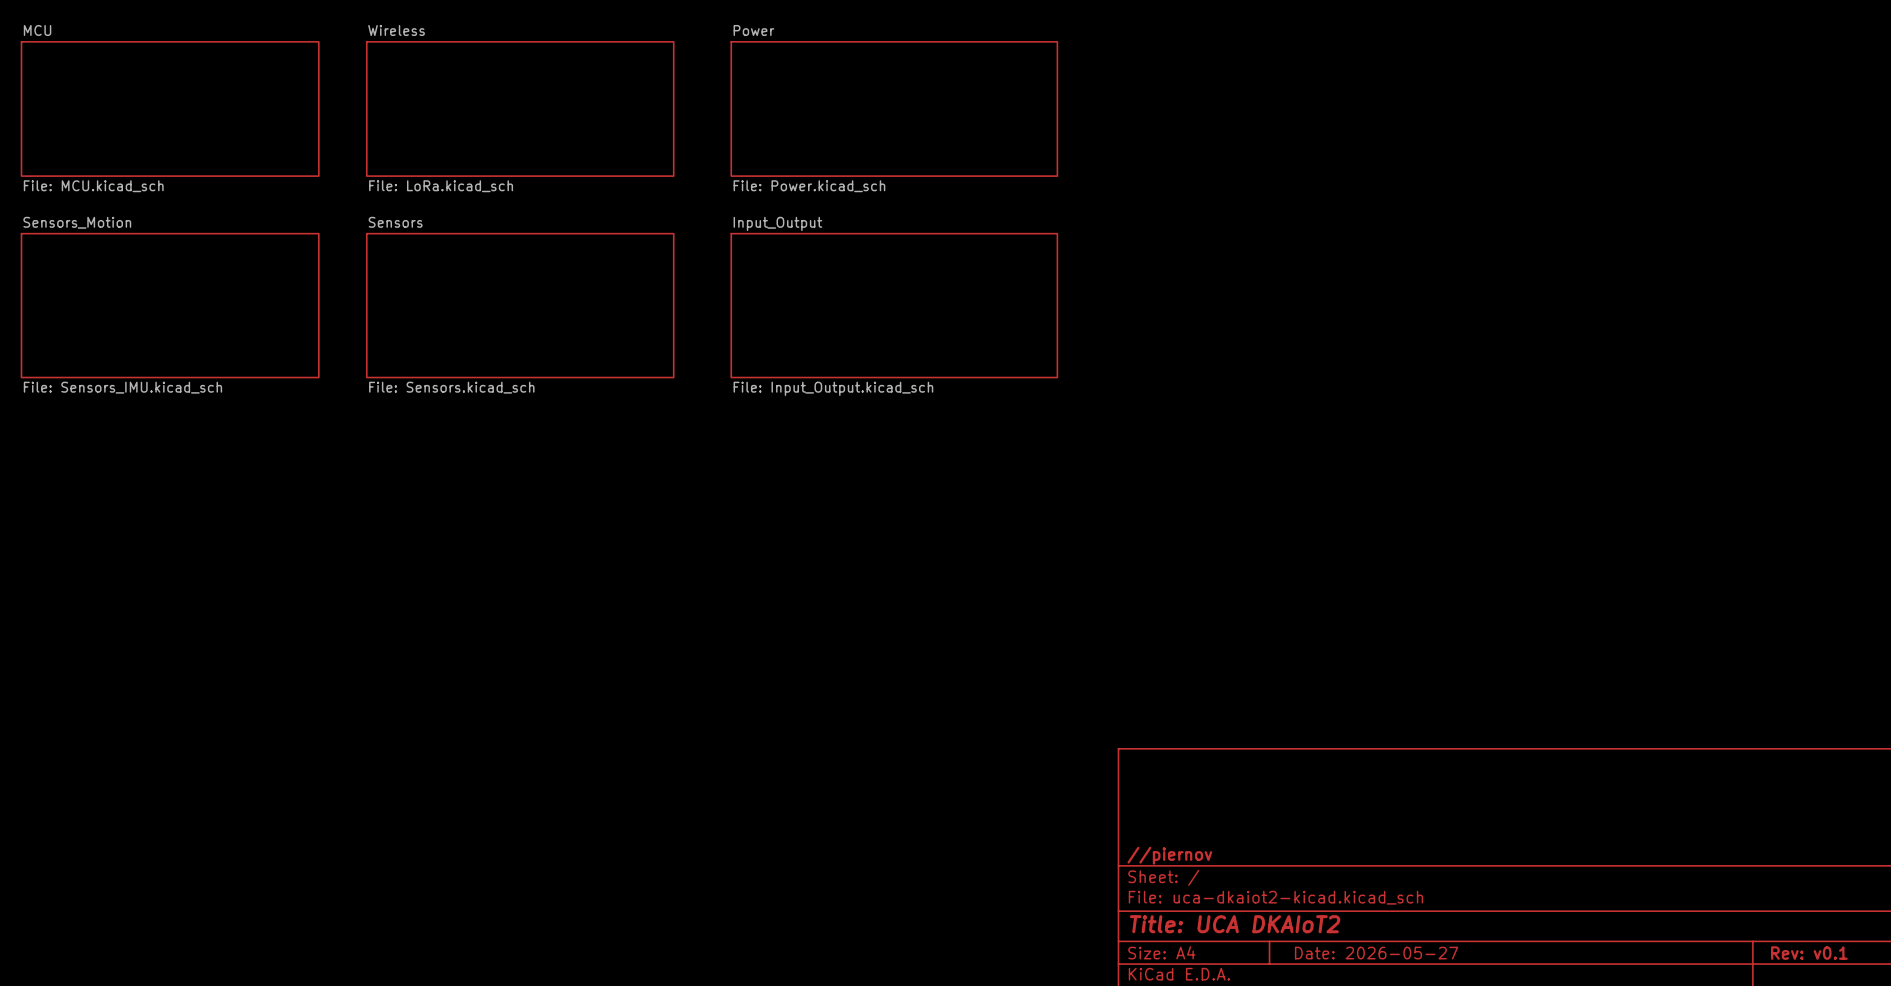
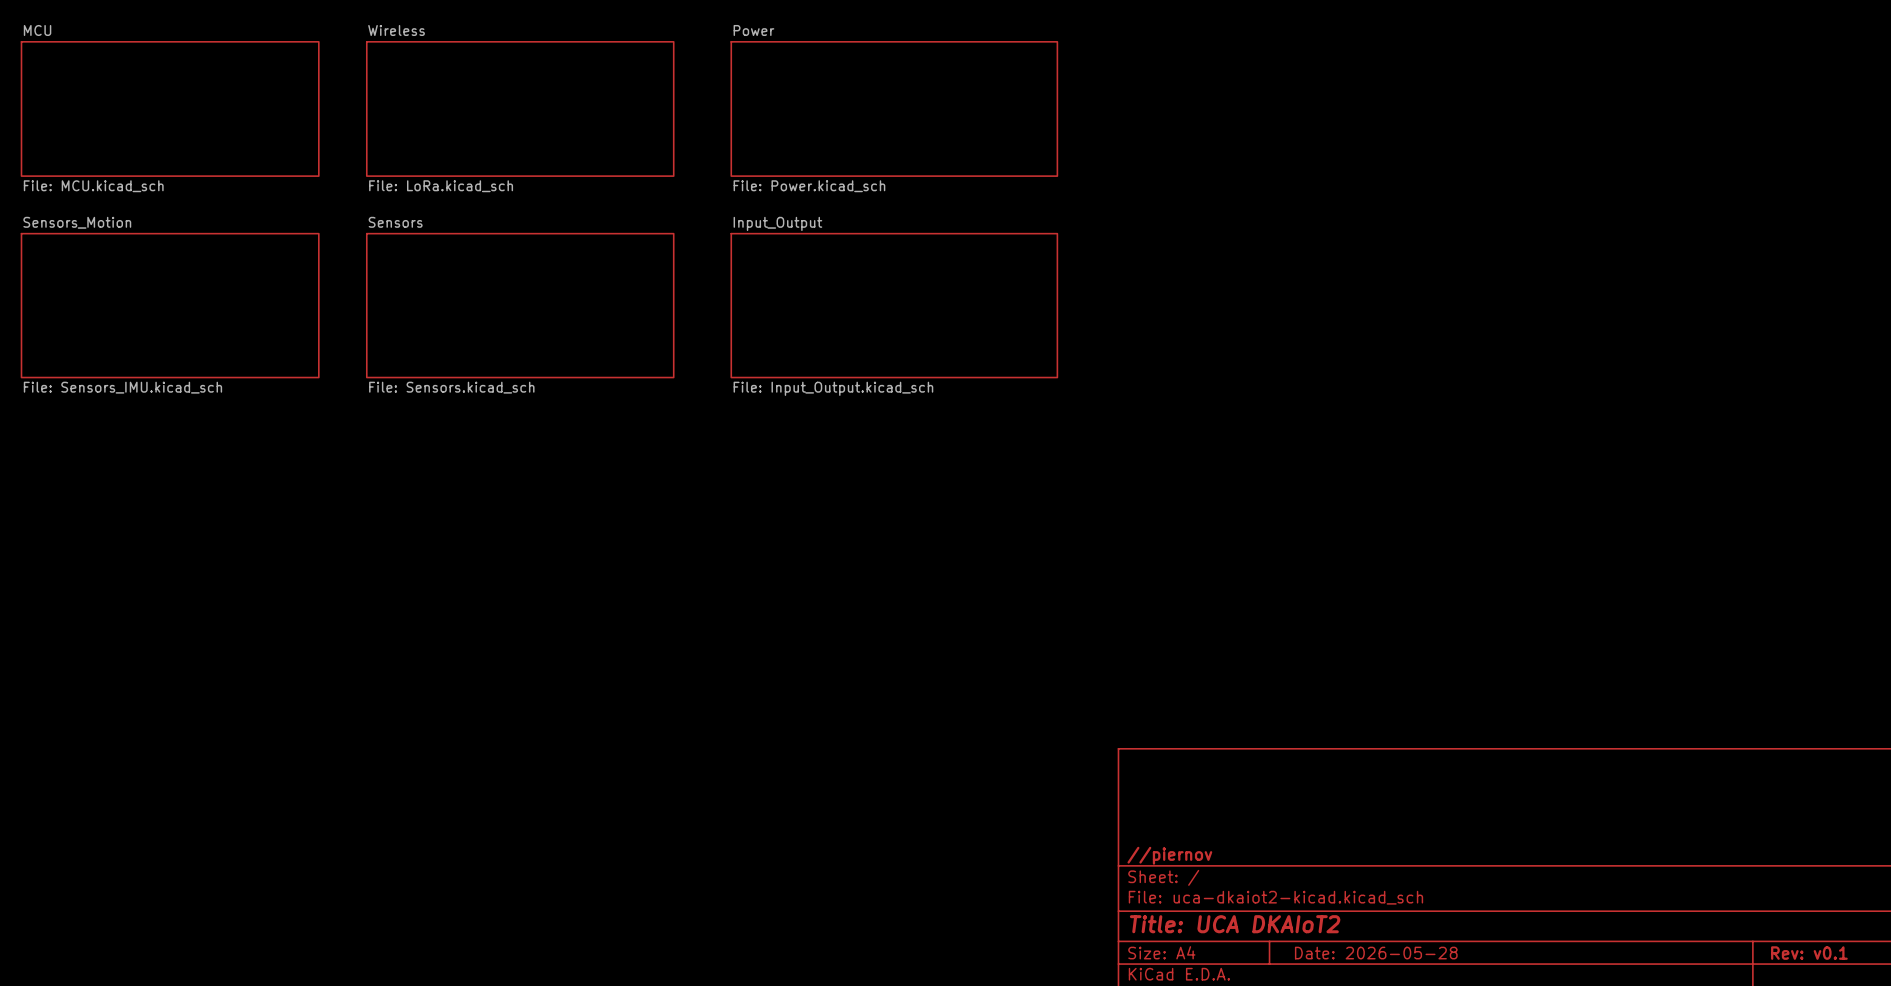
title block: Date: 2026-05-27 (1376, 953) -> Date: 2026-05-28 (1376, 953)

